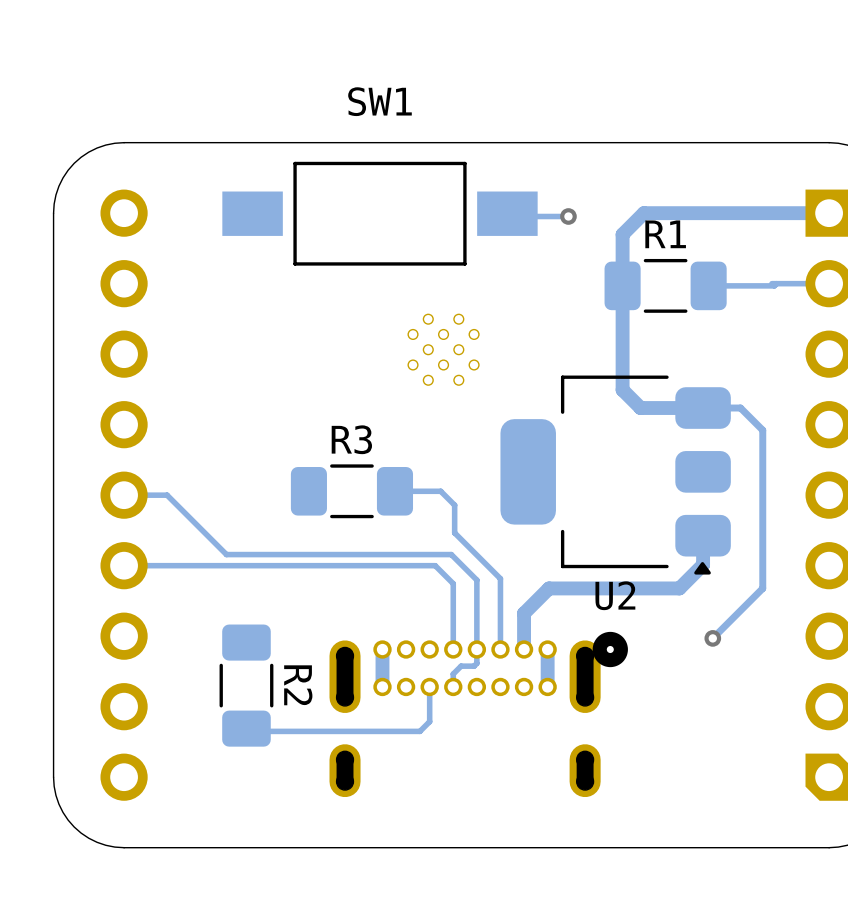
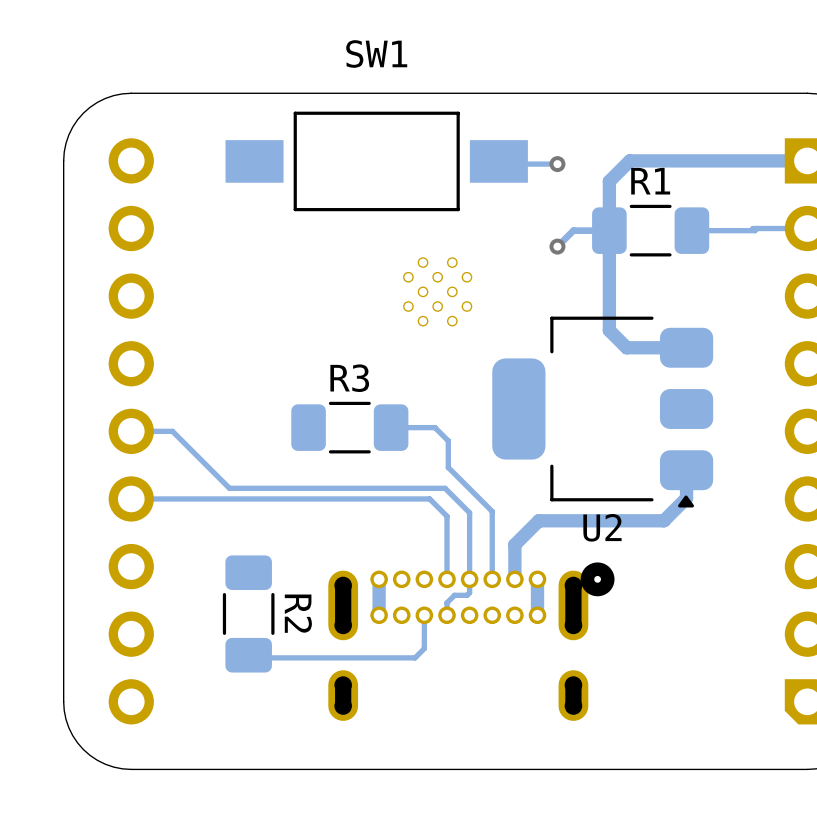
track: none -> (609, 230) (573, 230) (557, 246)
via: none -> (557, 246)
track: (703, 408) (740, 408) (762, 430) (762, 588) (712, 638) -> none
via: (712, 638) -> none

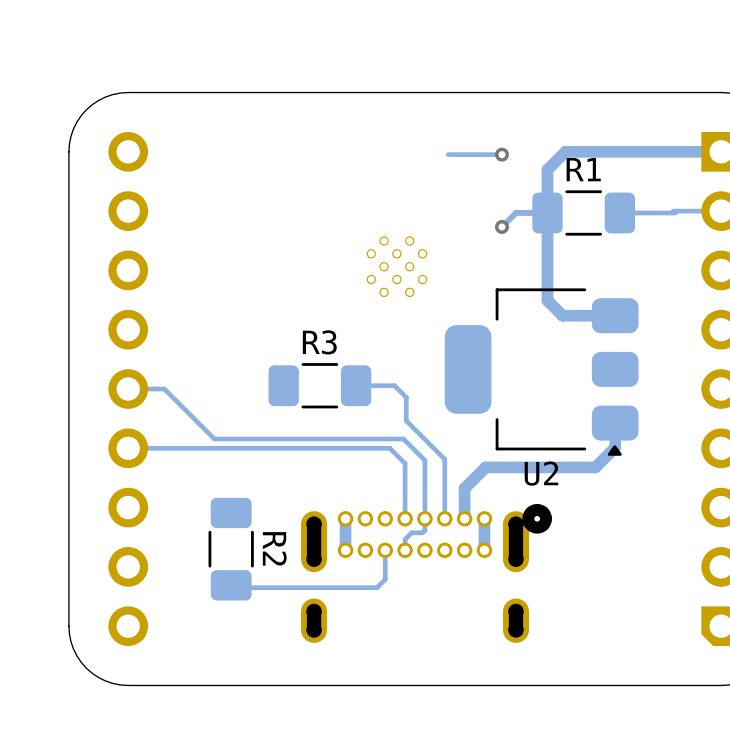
SW1: (376, 161) -> none

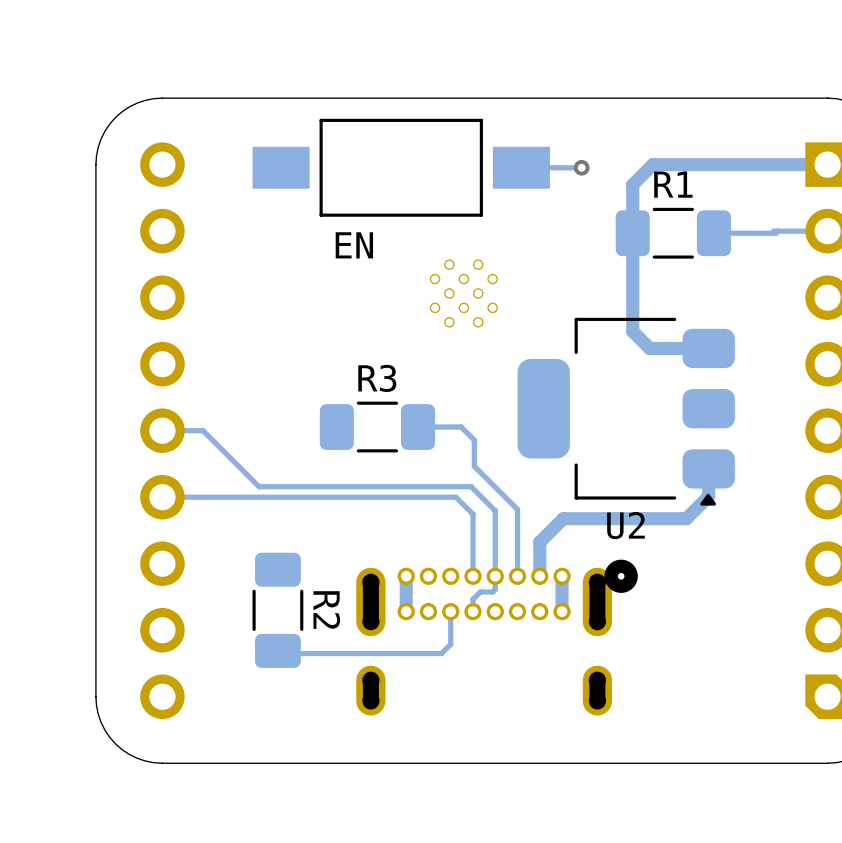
EN: none -> (401, 167)
track: (547, 212) (515, 212) (501, 226) -> none
via: (501, 226) -> none

